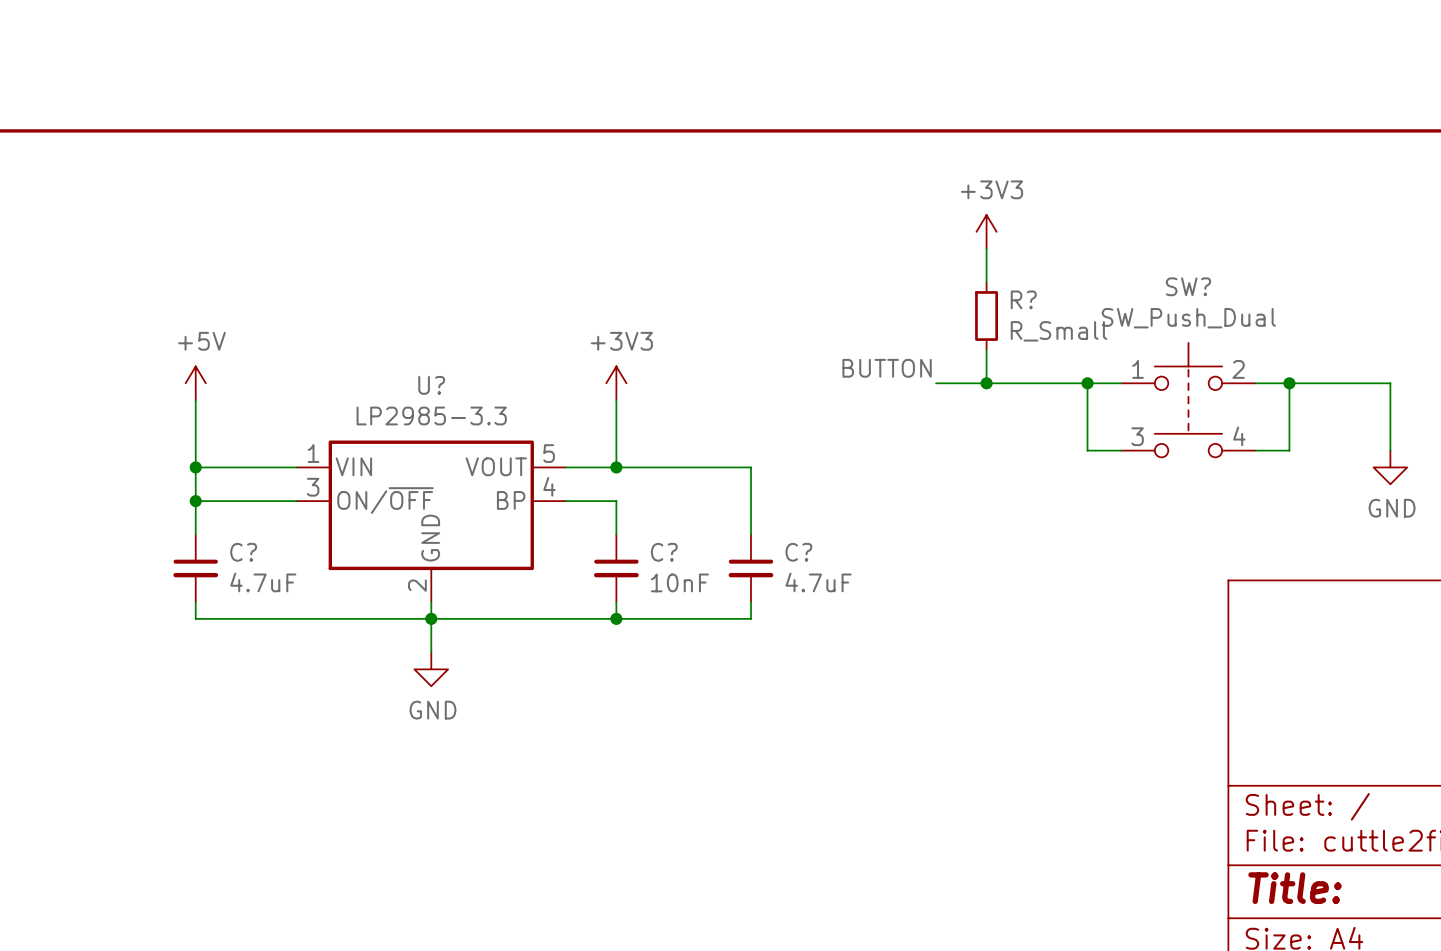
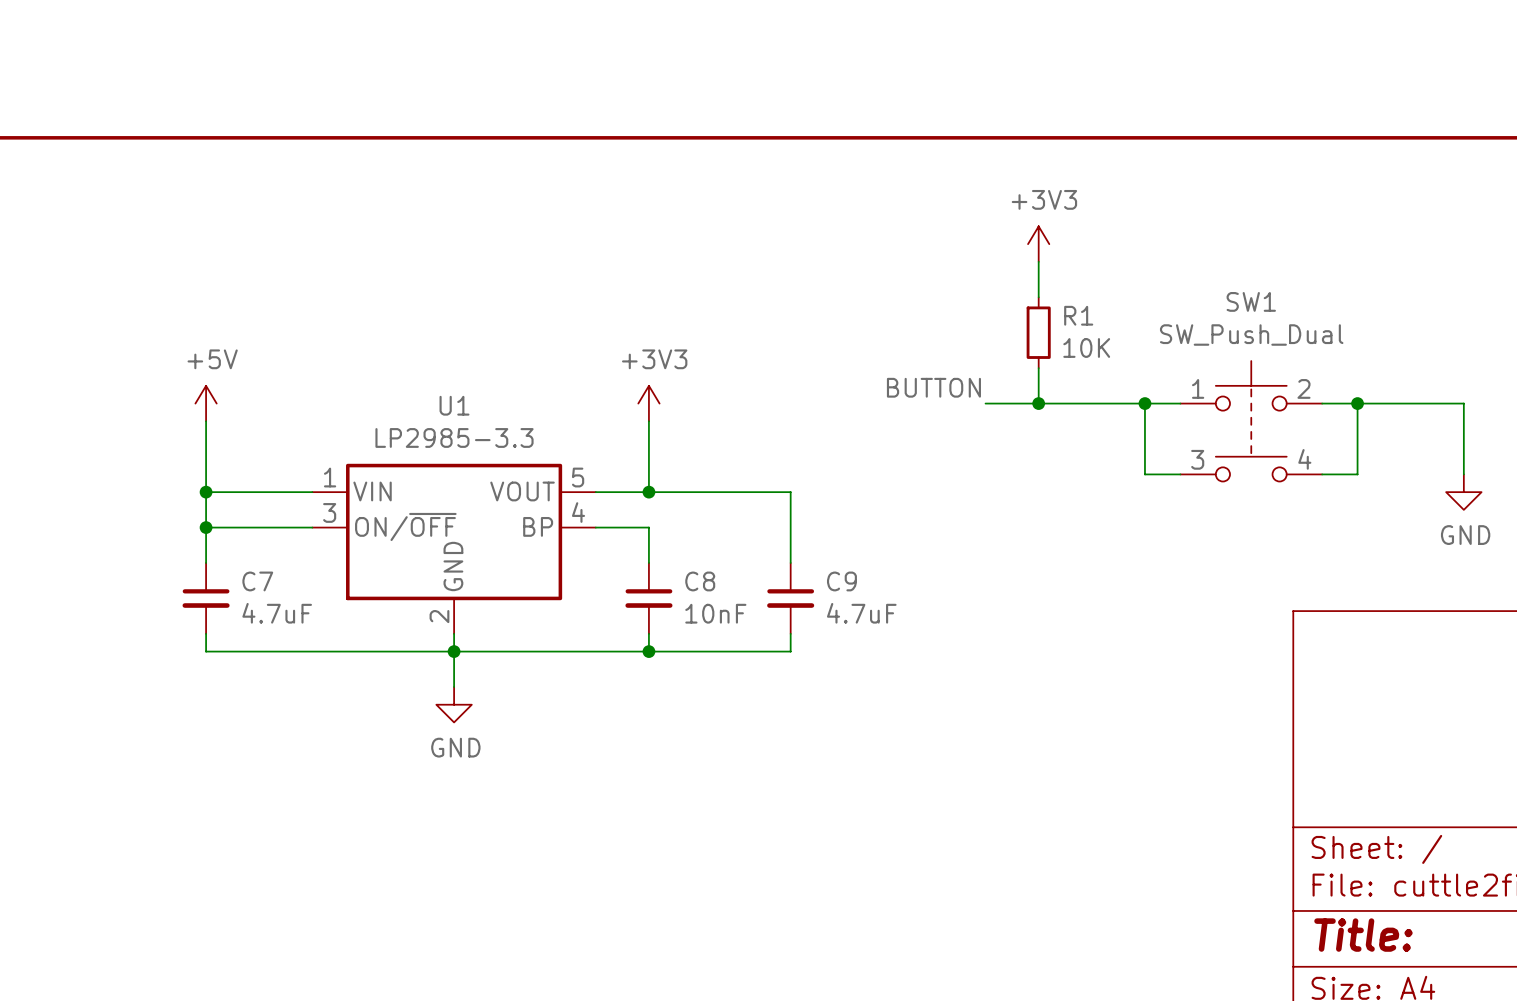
SW? name: SW? (1188, 286) -> SW1 (1251, 301)
R? name: R? (1023, 299) -> R1 (1078, 315)
R? value: R_Small (1059, 331) -> 10K (1086, 347)
U? name: U? (431, 385) -> U1 (454, 405)
C? name: C? (243, 552) -> C7 (257, 581)
C? name: C? (664, 552) -> C8 (700, 581)
C? name: C? (798, 552) -> C9 (841, 581)

